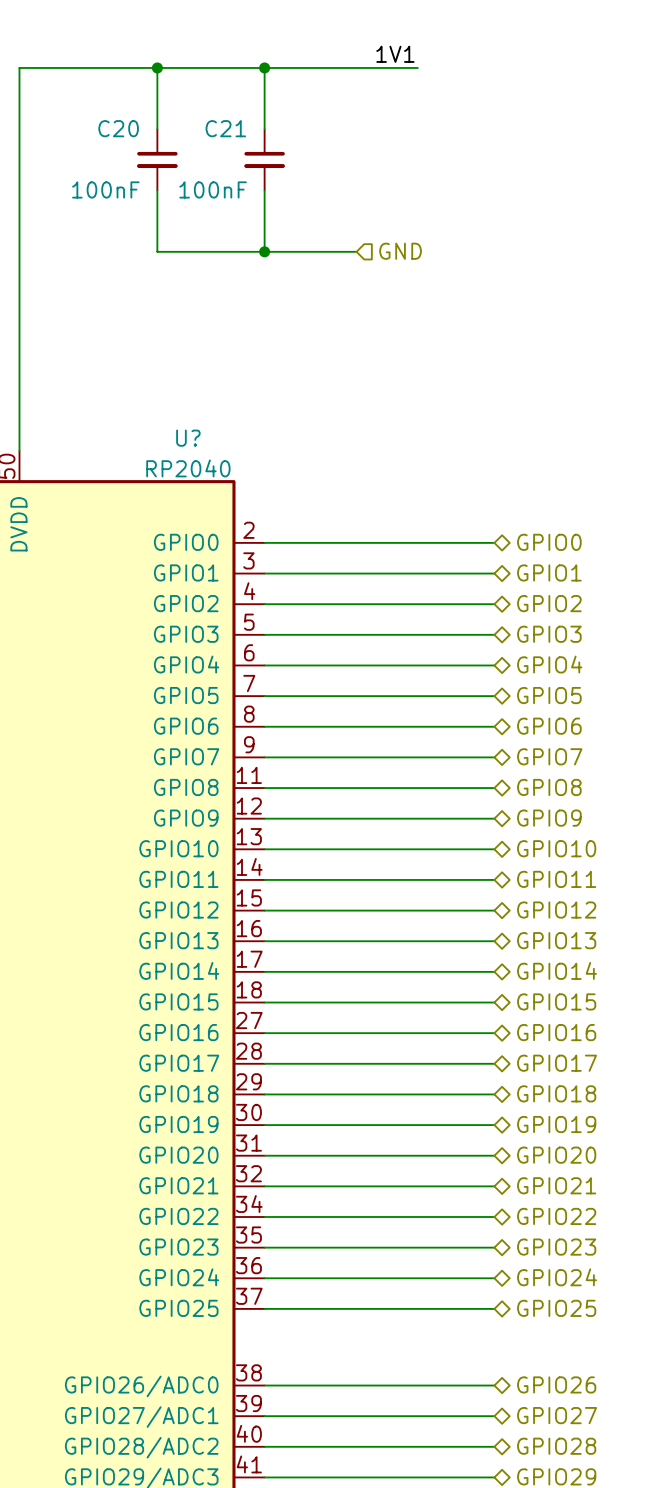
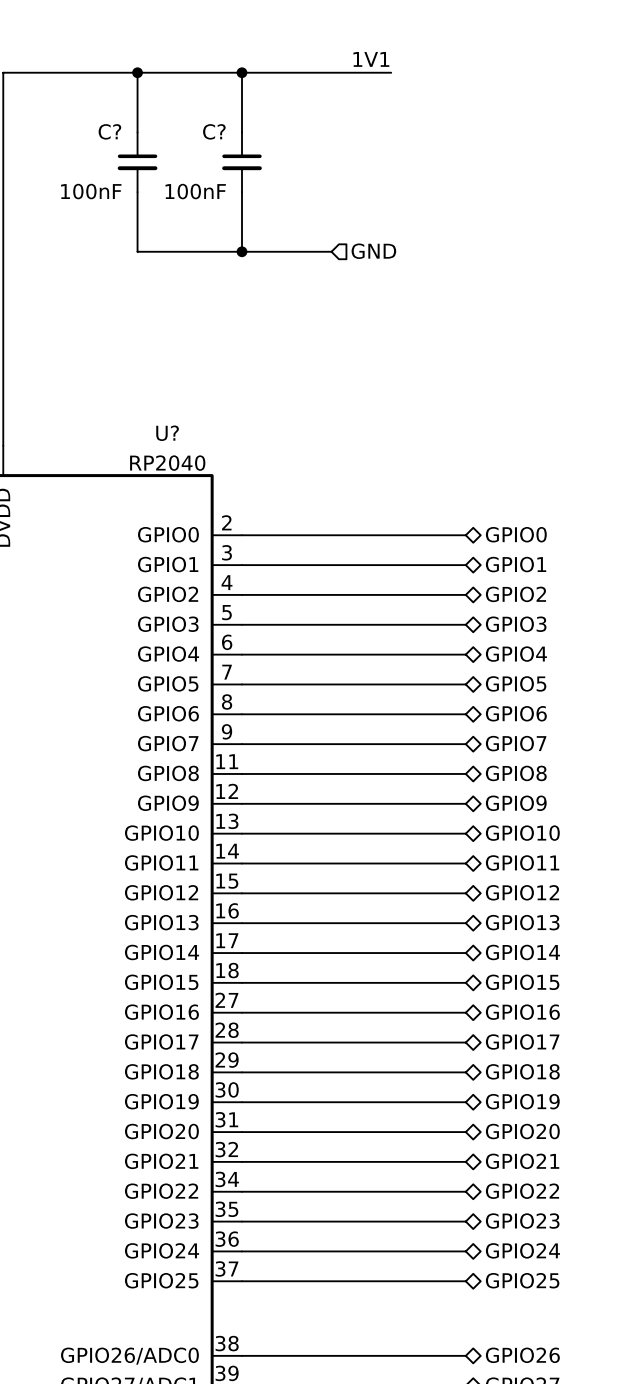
C20 name: C20 (118, 128) -> C? (109, 131)
C21 name: C21 (225, 128) -> C? (214, 131)

